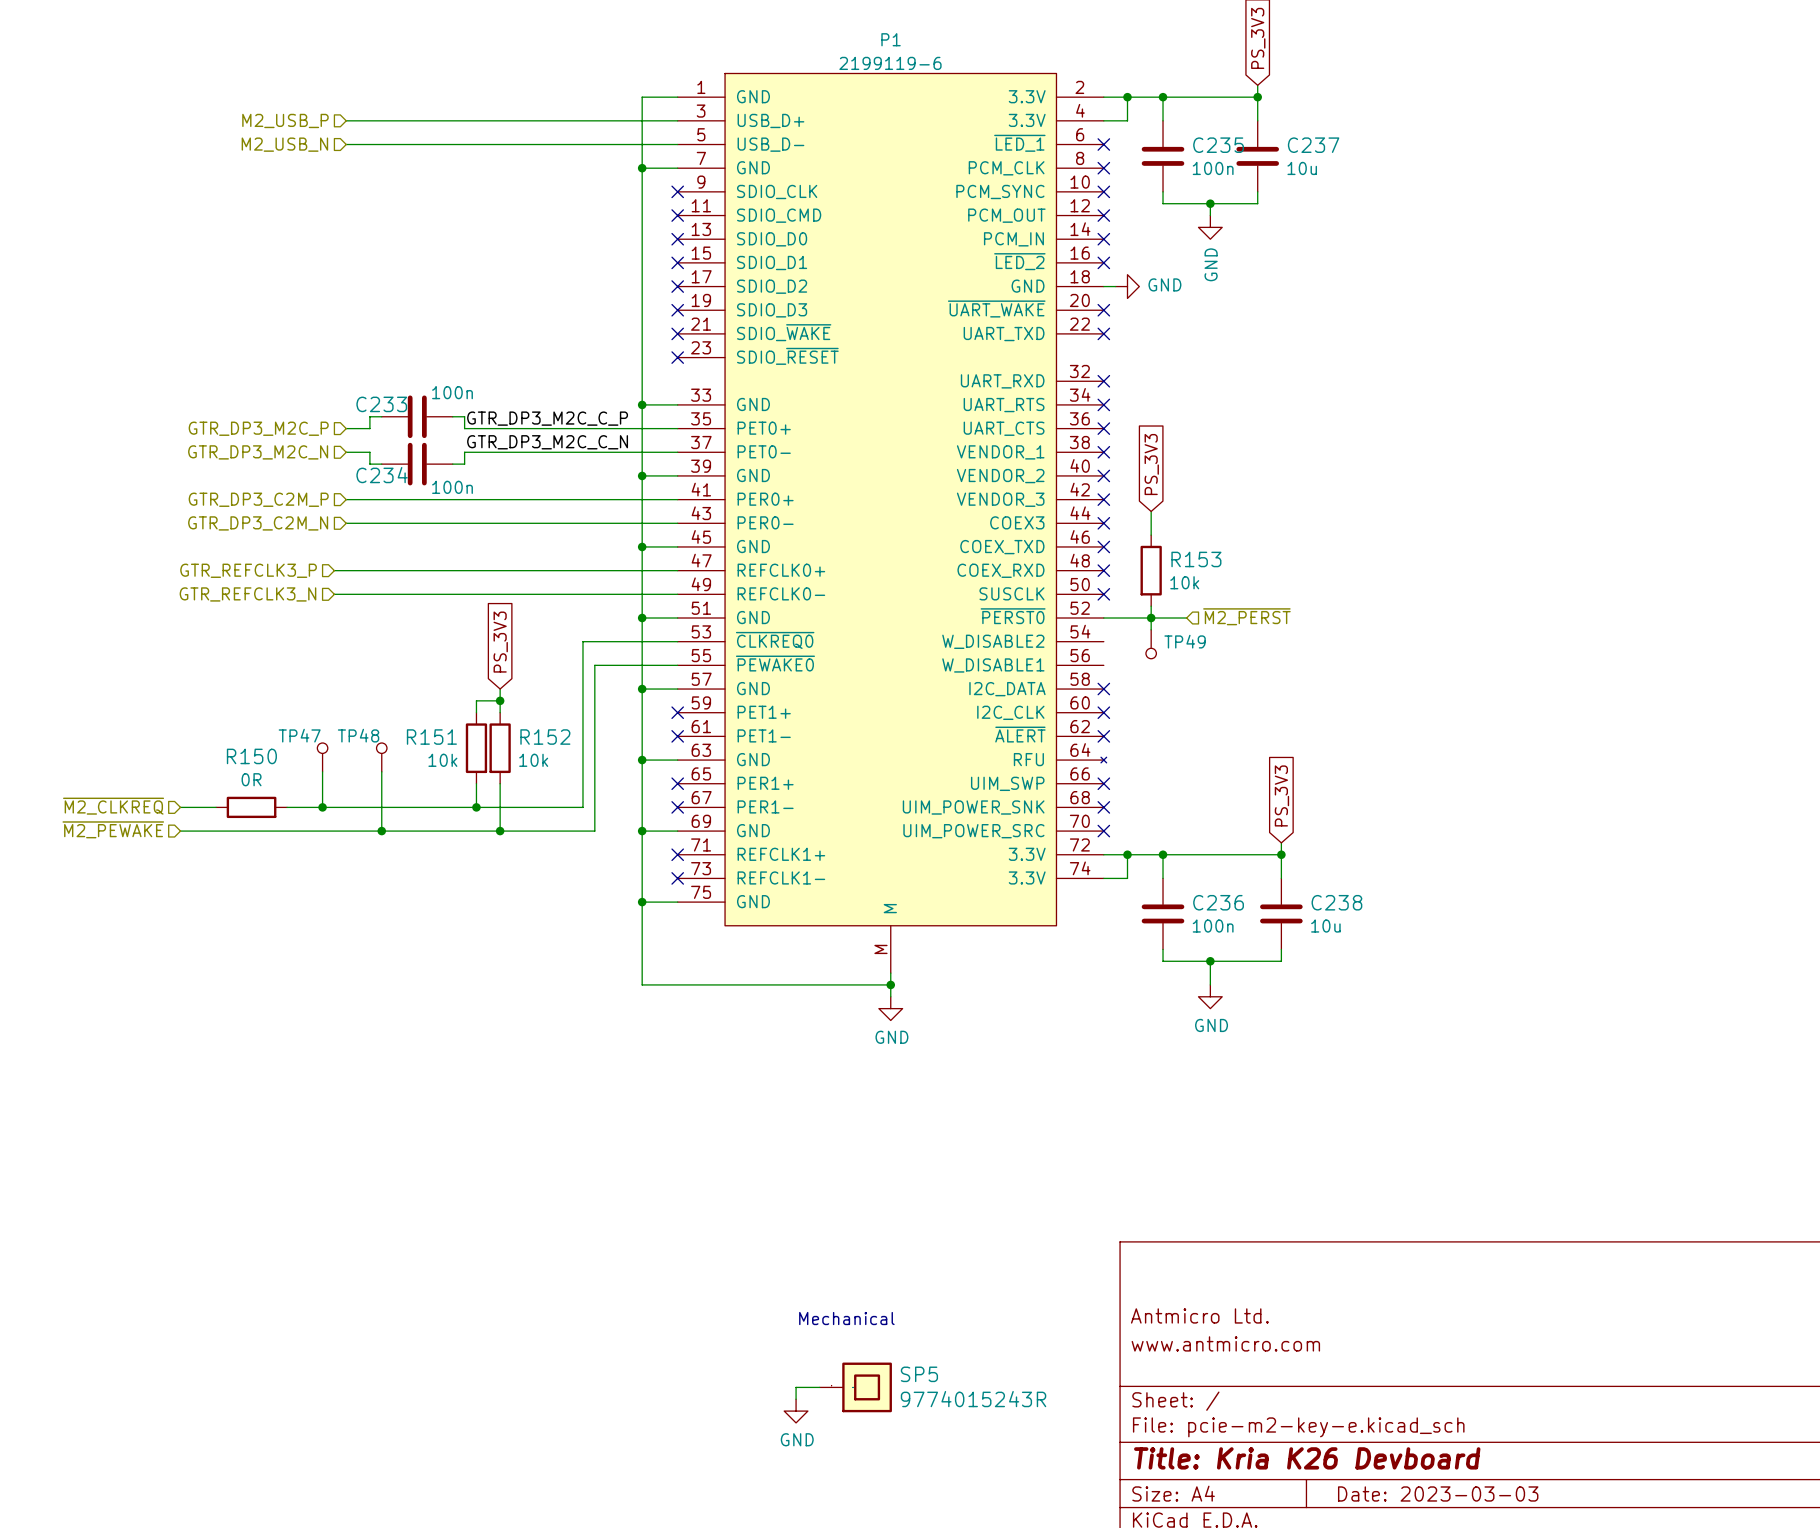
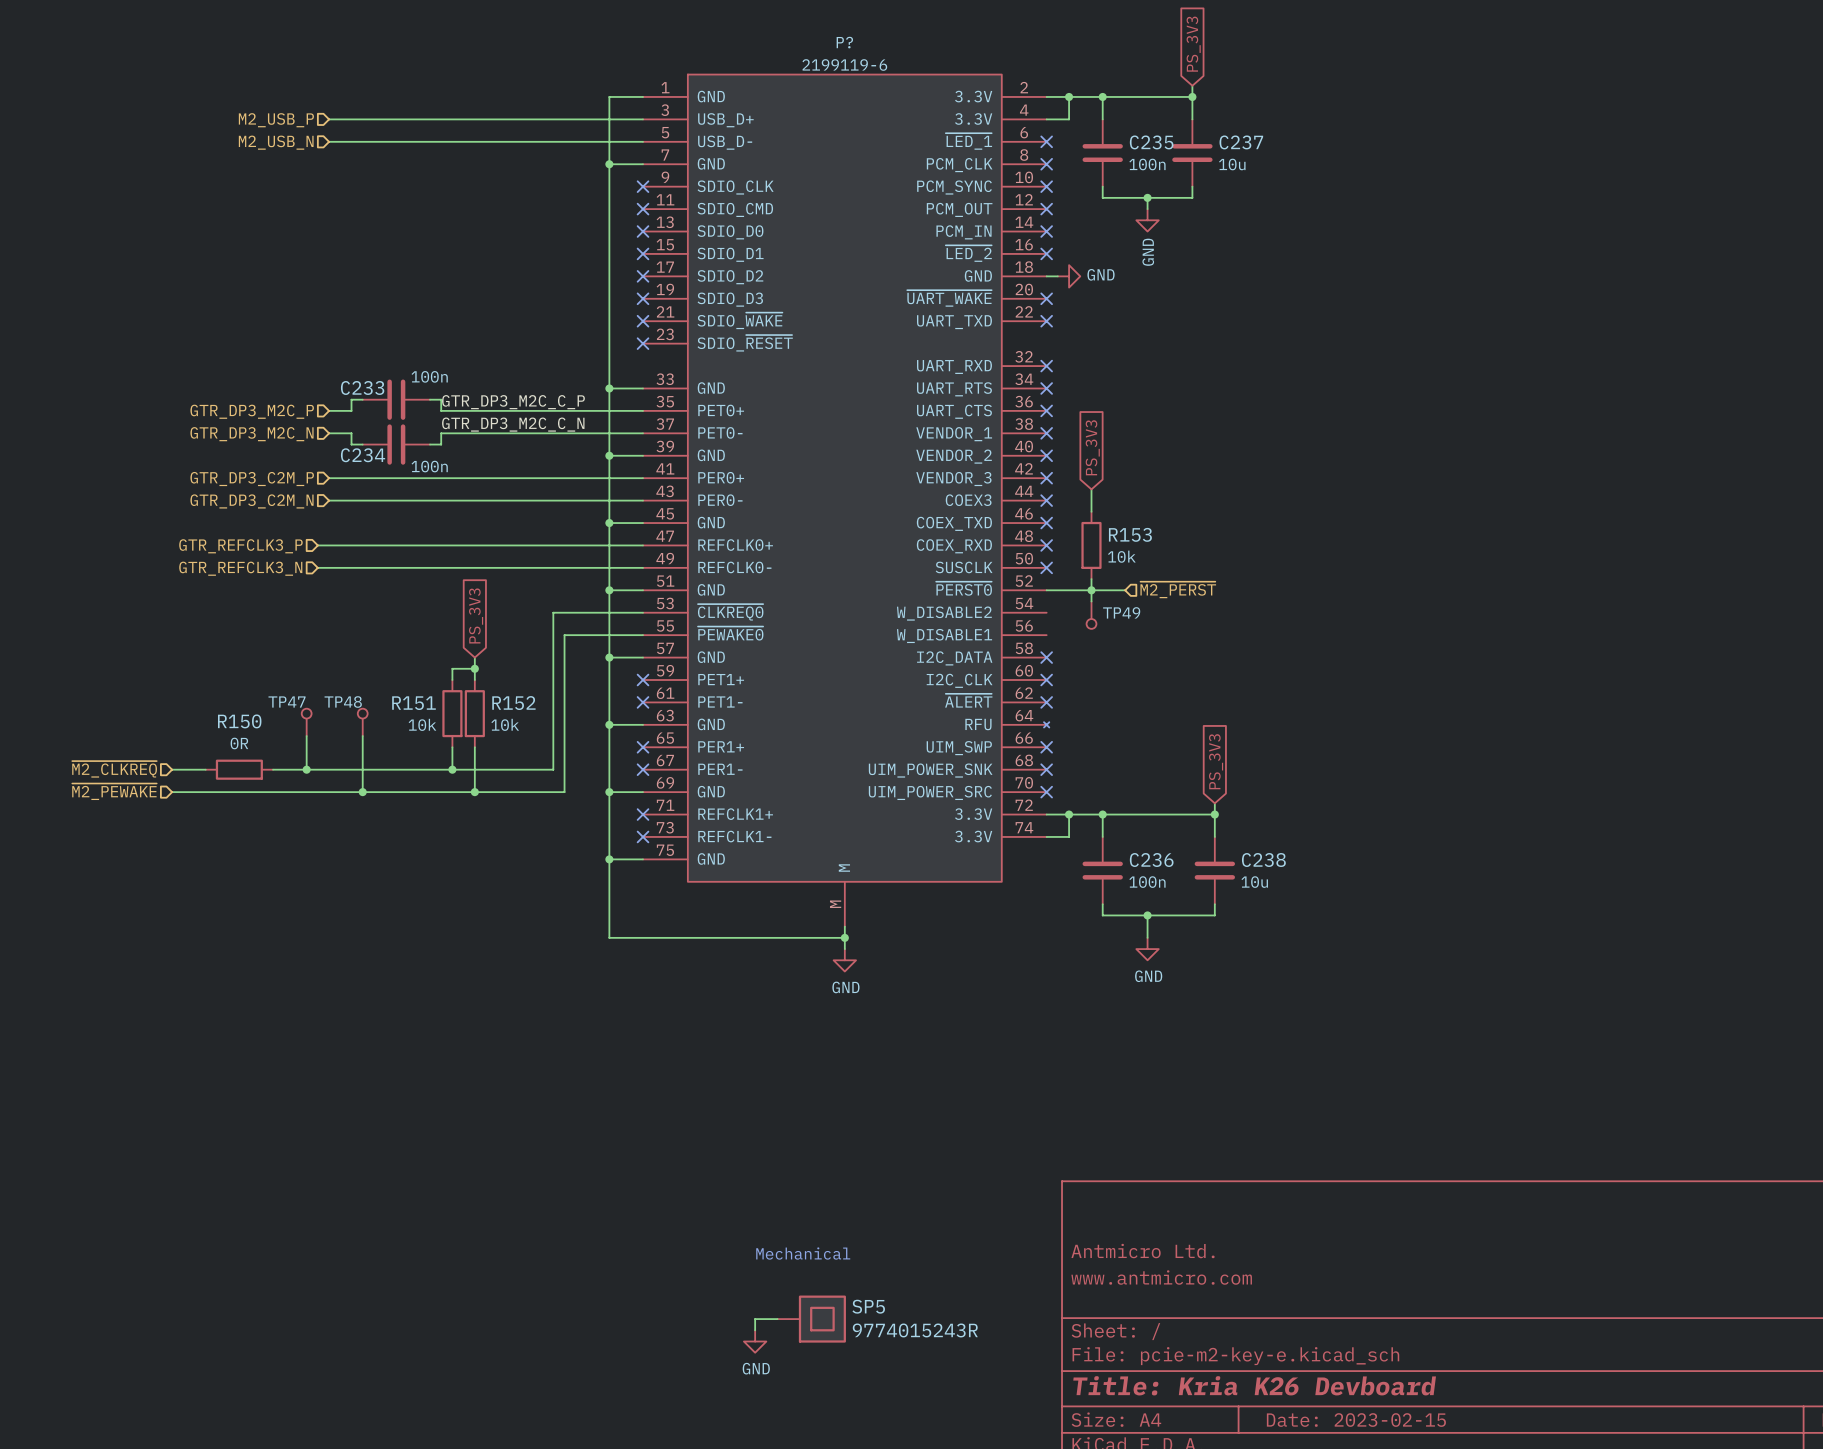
P1 name: P1 (891, 39) -> P? (844, 42)
title block: Date: 2023-03-03 (1438, 1493) -> Date: 2023-02-15 (1356, 1420)

